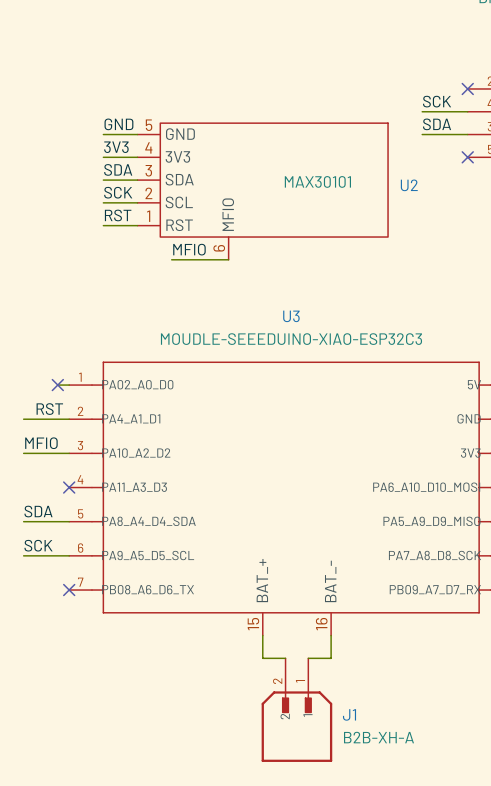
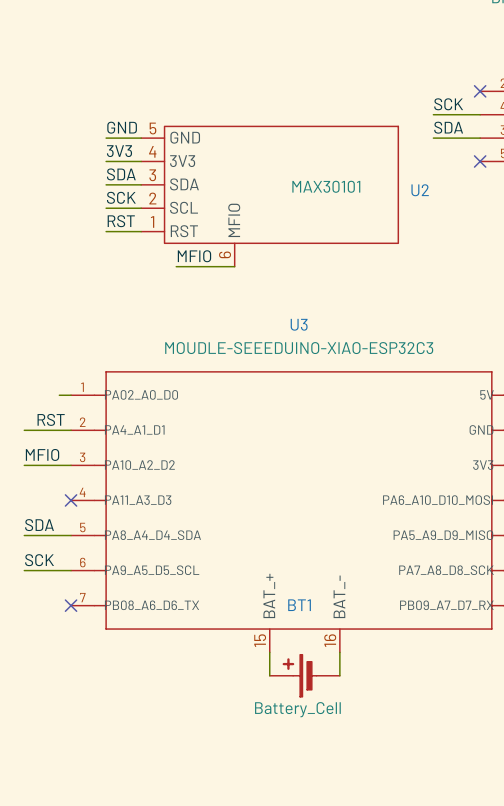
no-connect mark: (57, 385) -> none
BT1: none -> Battery_Cell (304, 675)
J1: B2B-XH-A (296, 710) -> none

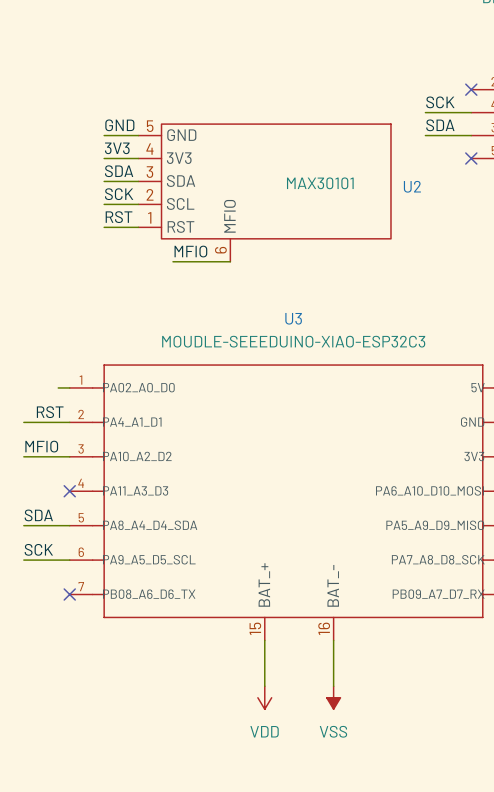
wire: none -> (264, 663) (264, 686)
BT1: Battery_Cell (304, 675) -> none
wire: none -> (333, 663) (333, 686)
power symbol: none -> VDD (264, 697)
power symbol: none -> VSS (333, 697)

